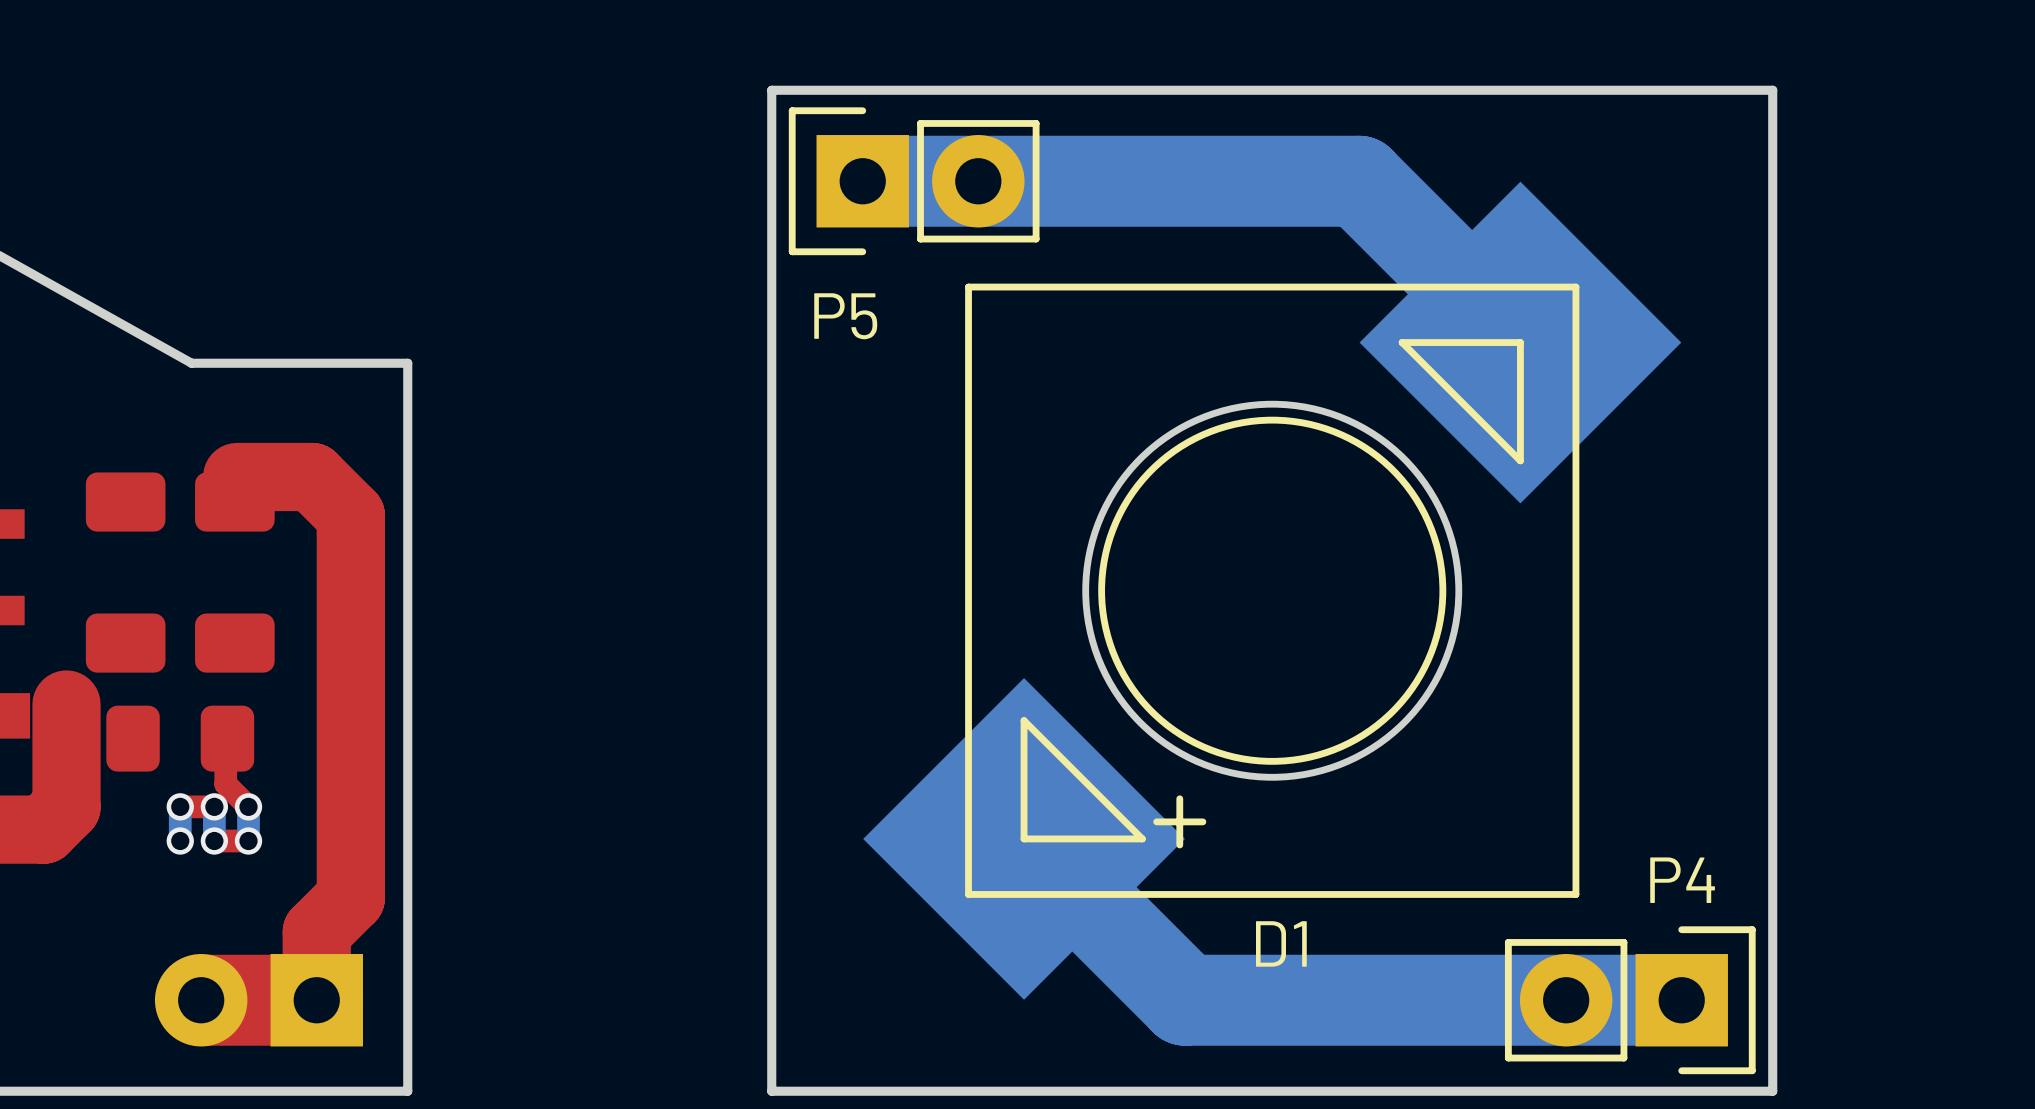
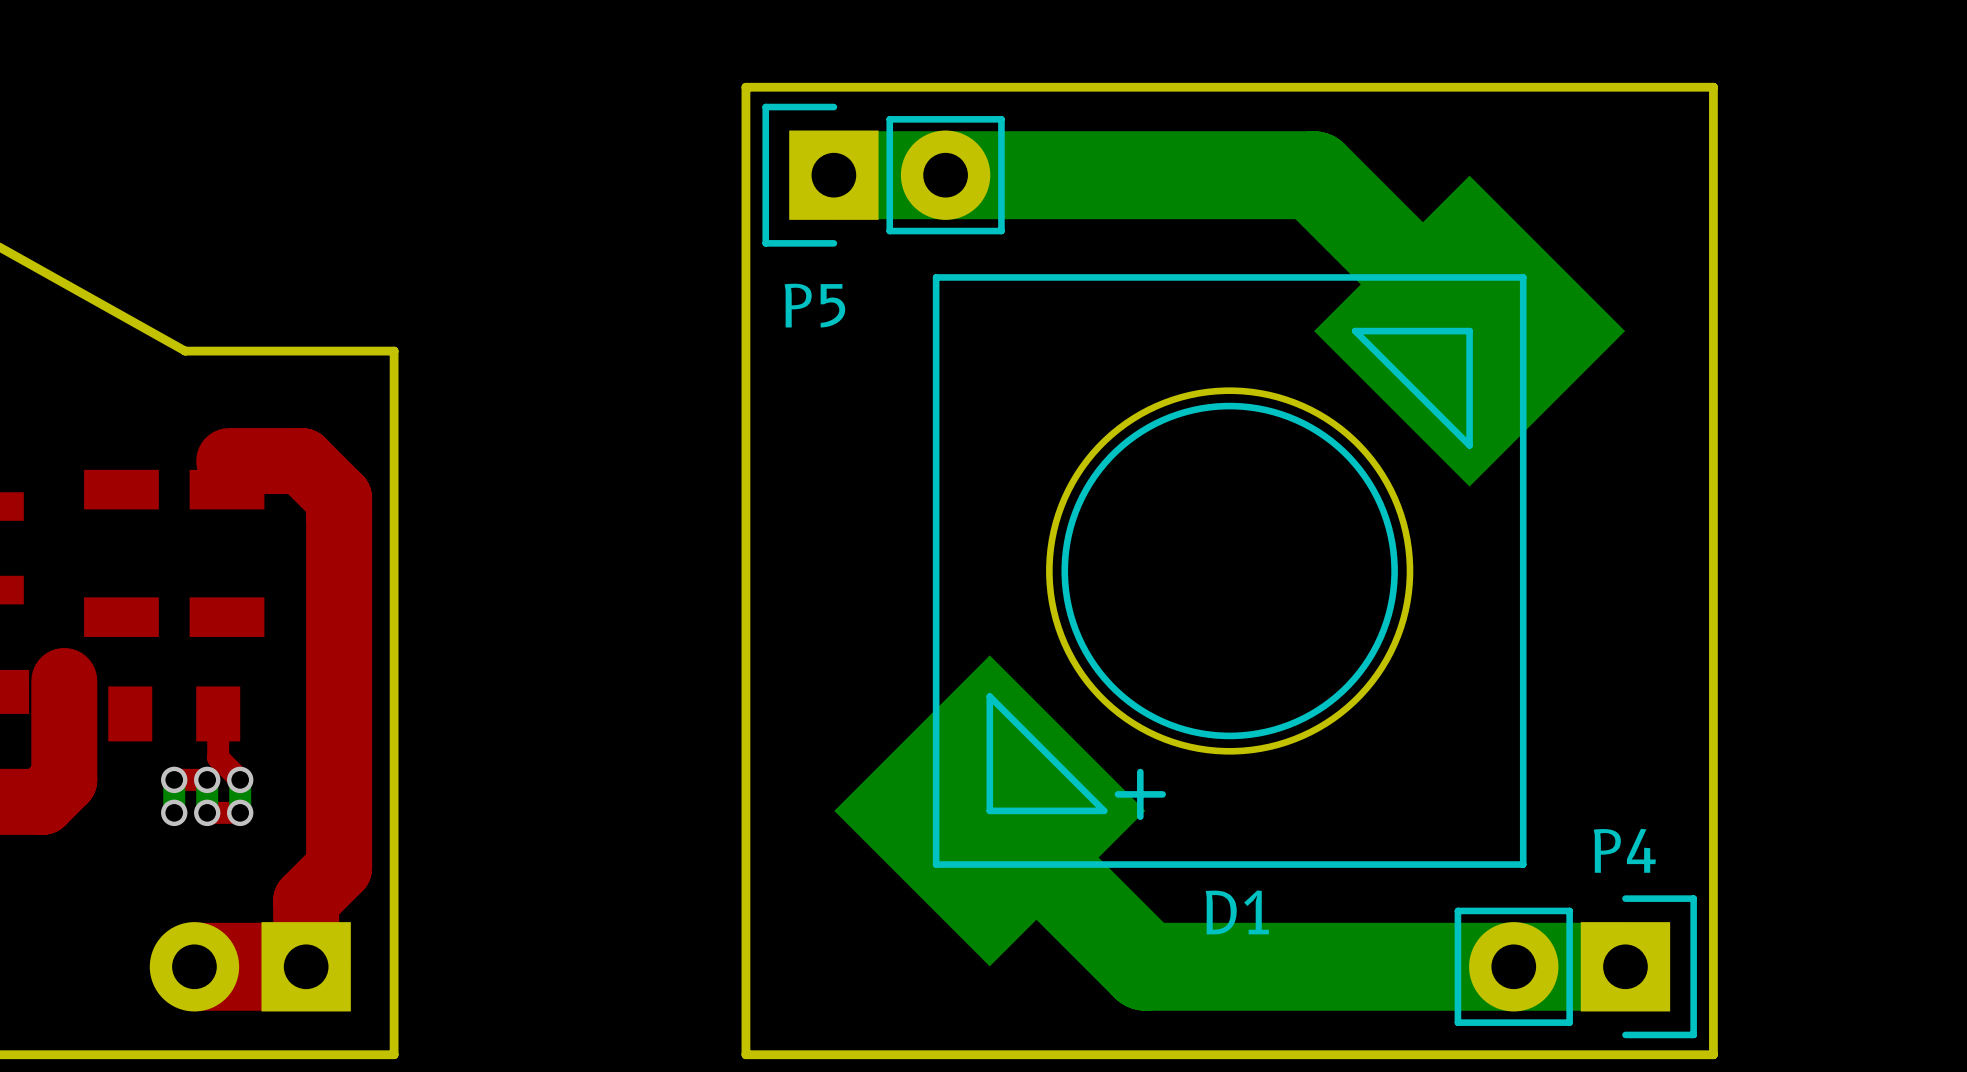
part footprint: [85, 472, 166, 673] -> [84, 469, 159, 637]
part footprint: [195, 472, 275, 673] -> [189, 469, 265, 637]
part footprint: [106, 705, 255, 772] -> [108, 686, 241, 742]

